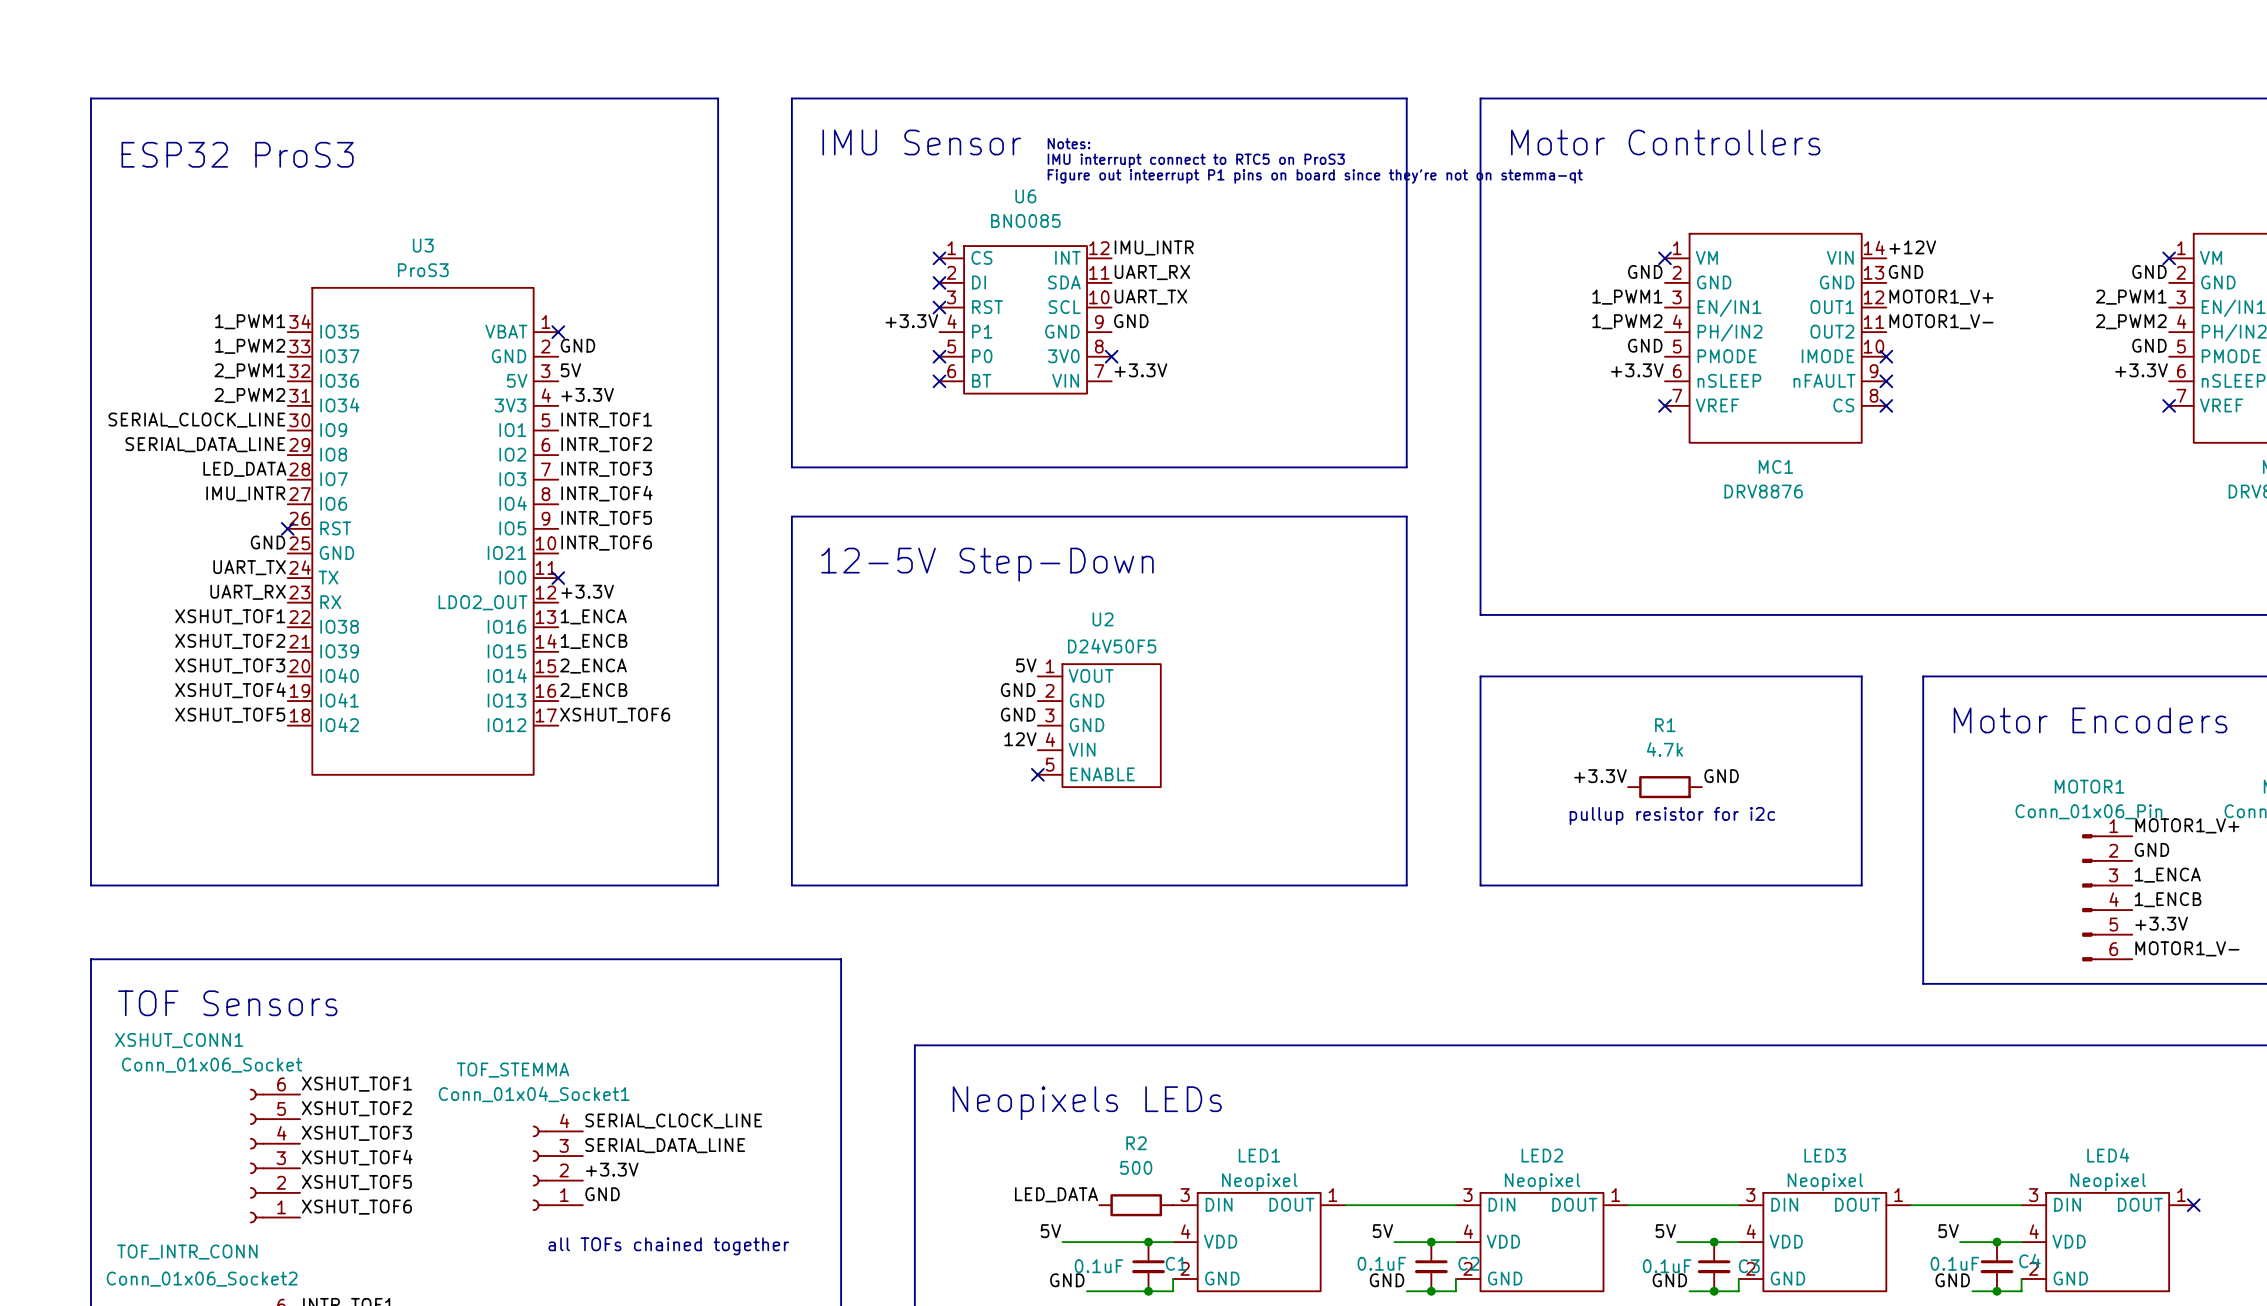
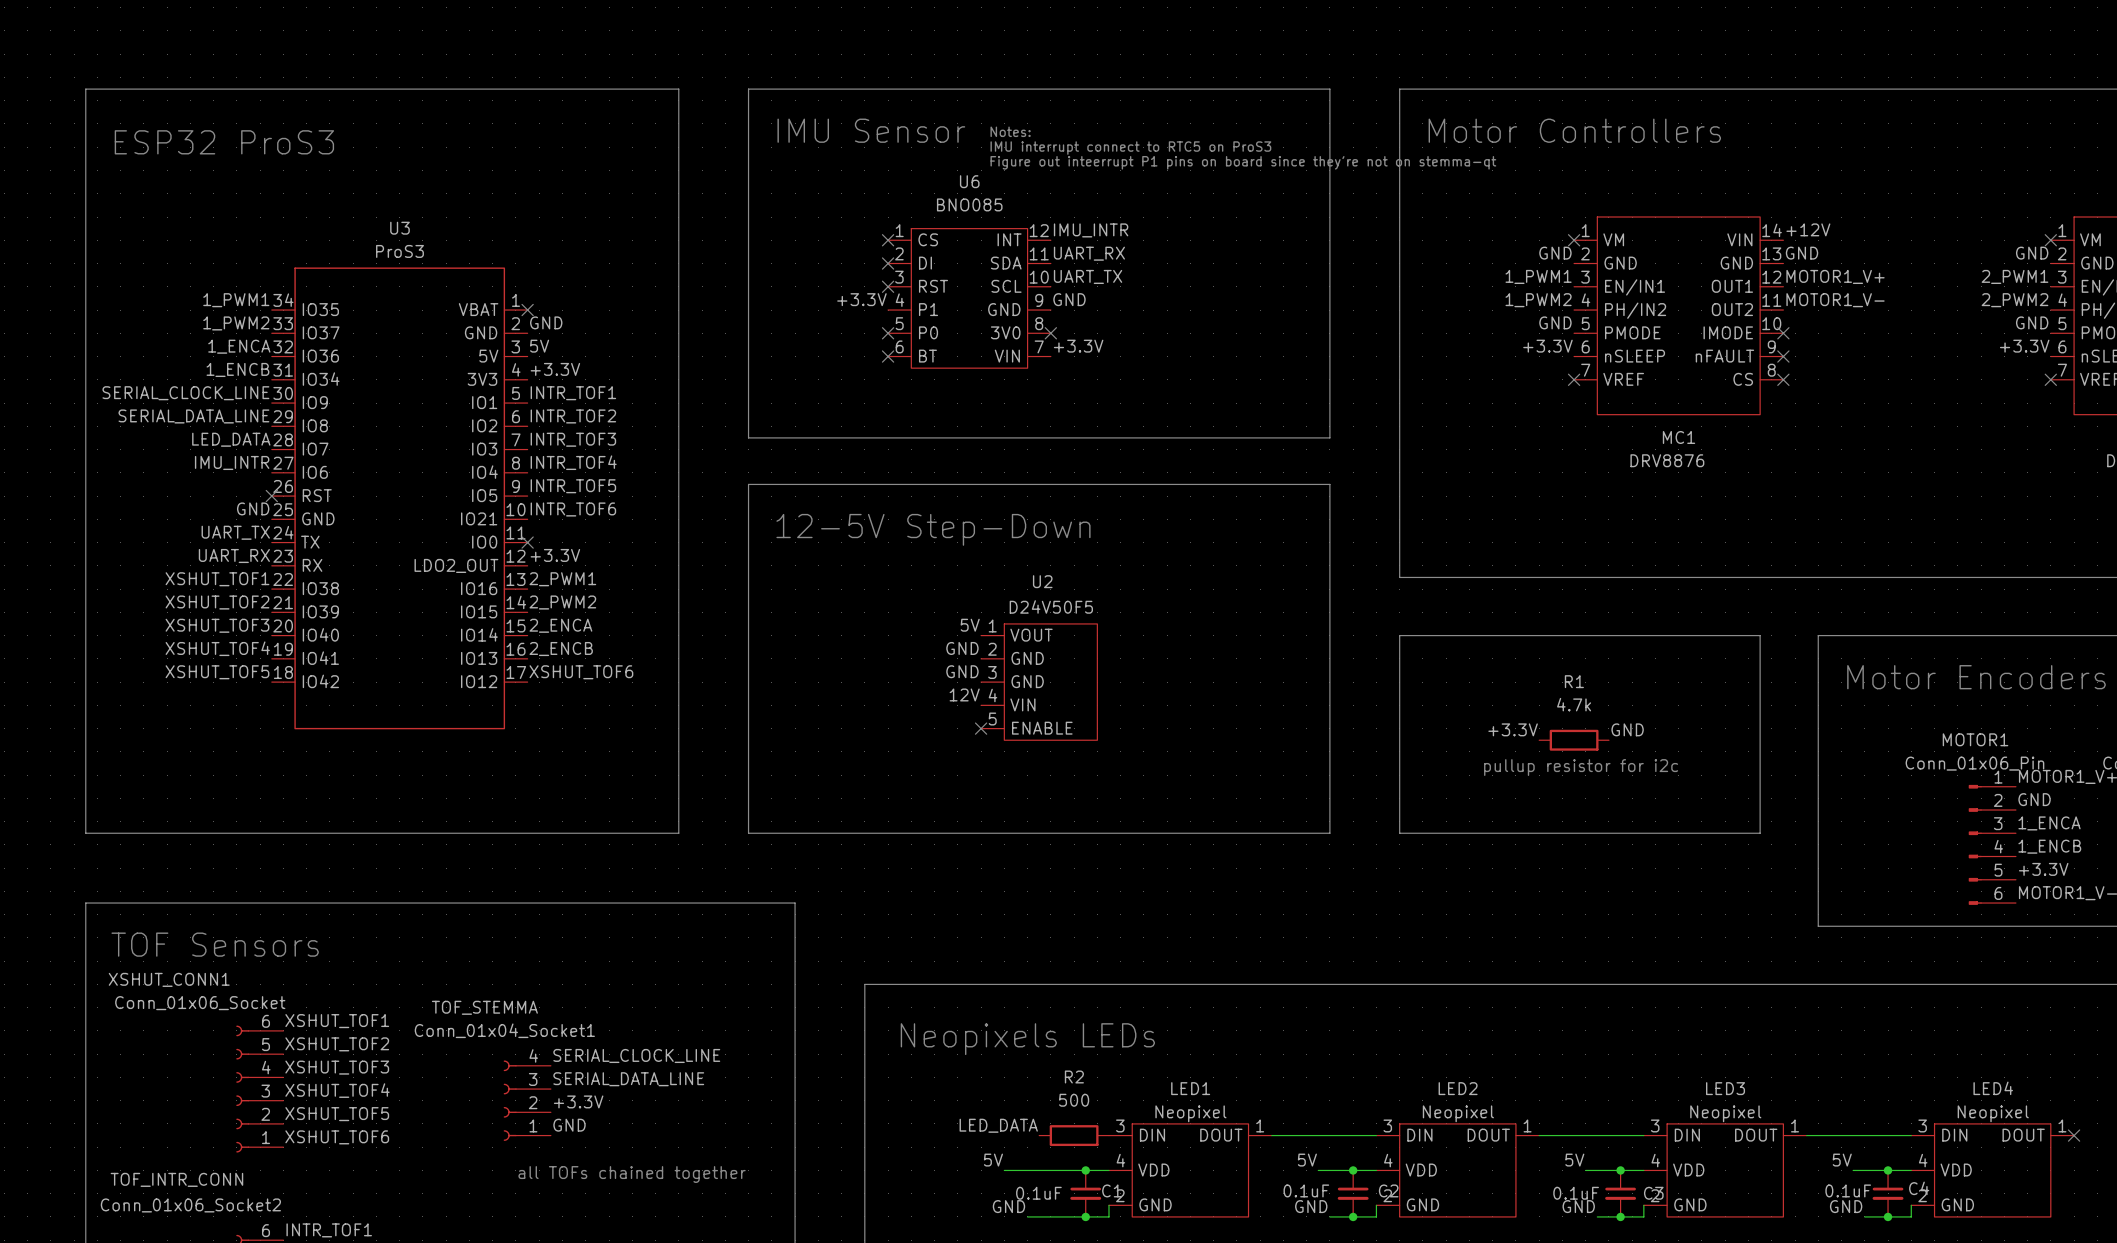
label: 2_PWM1 (249, 370) -> 1_ENCA (239, 346)
label: 2_PWM2 (249, 395) -> 1_ENCB (237, 369)
label: 1_ENCA (593, 616) -> 2_PWM1 (562, 579)
label: 1_ENCB (594, 641) -> 2_PWM2 (562, 602)

